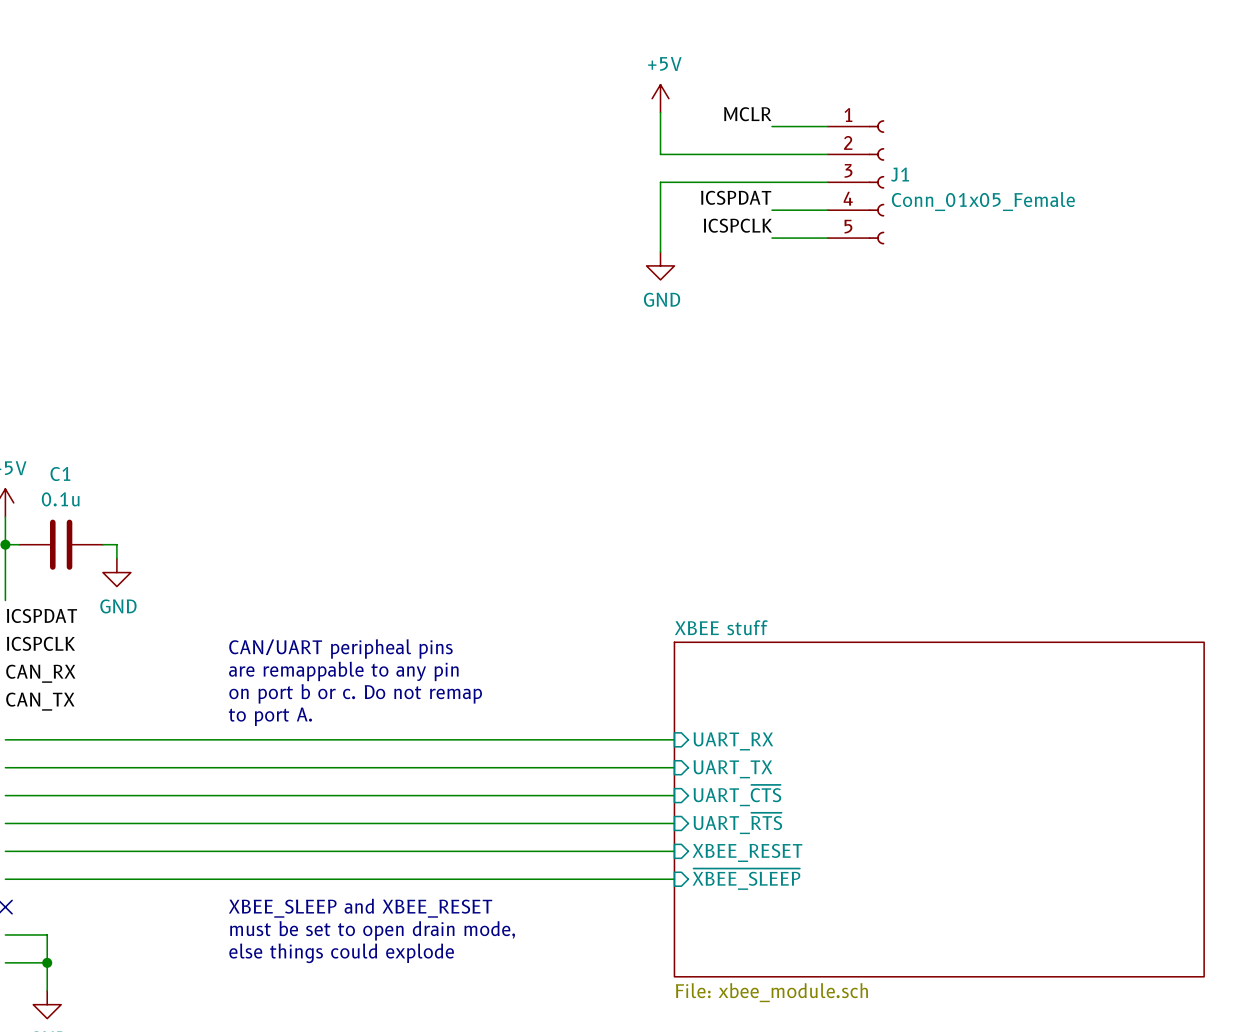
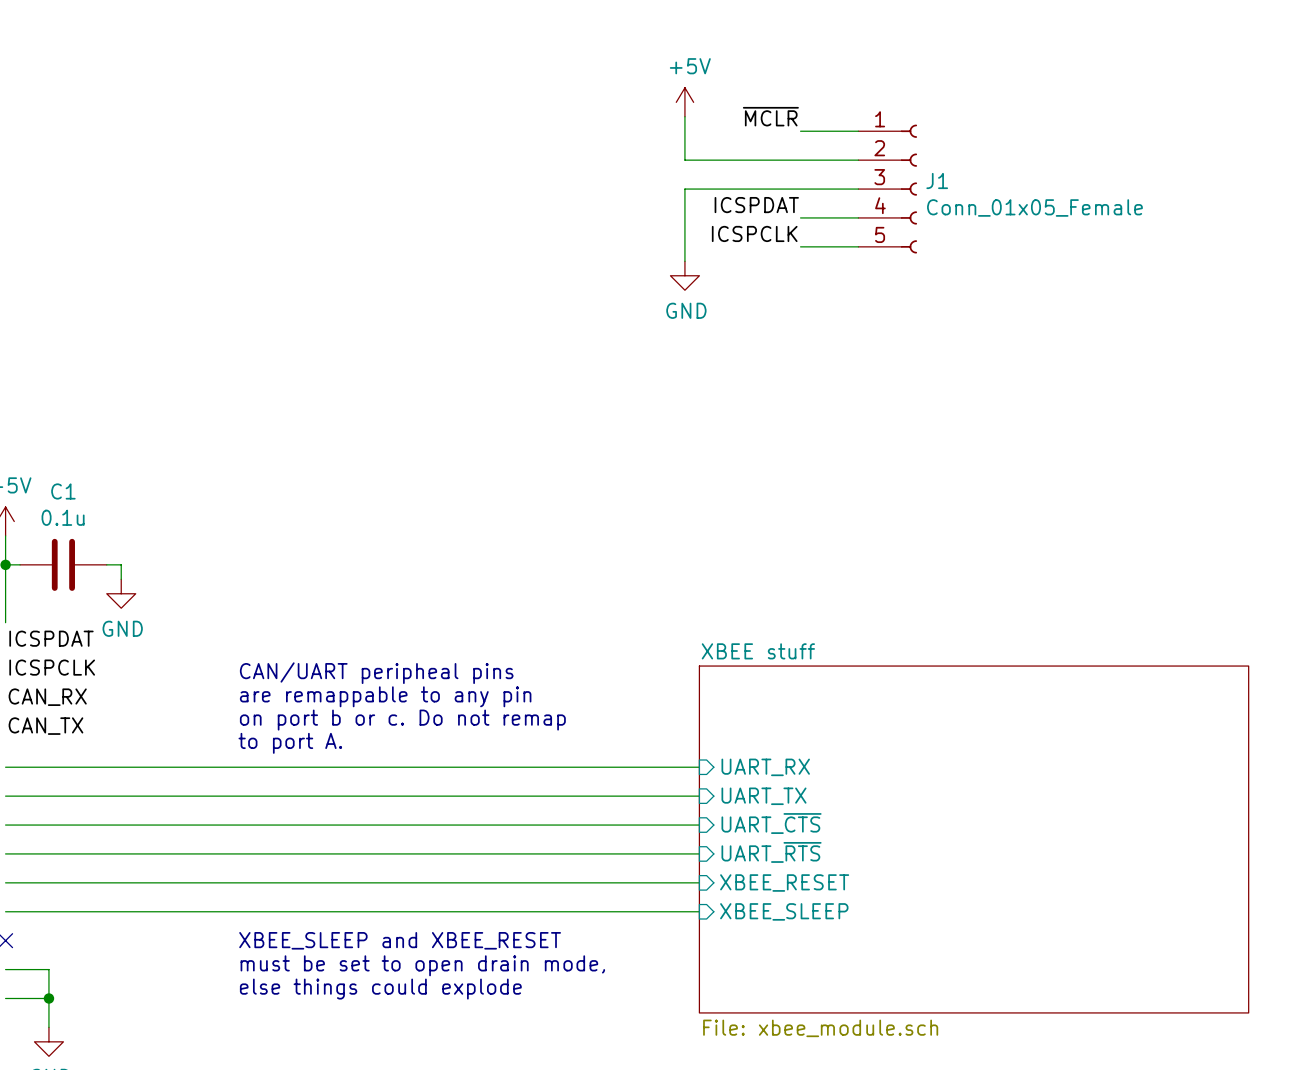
label: MCLR (747, 114) -> ~{MCLR} (770, 116)
sheet pin: ~{XBEE_SLEEP} (746, 879) -> XBEE_SLEEP (784, 911)

